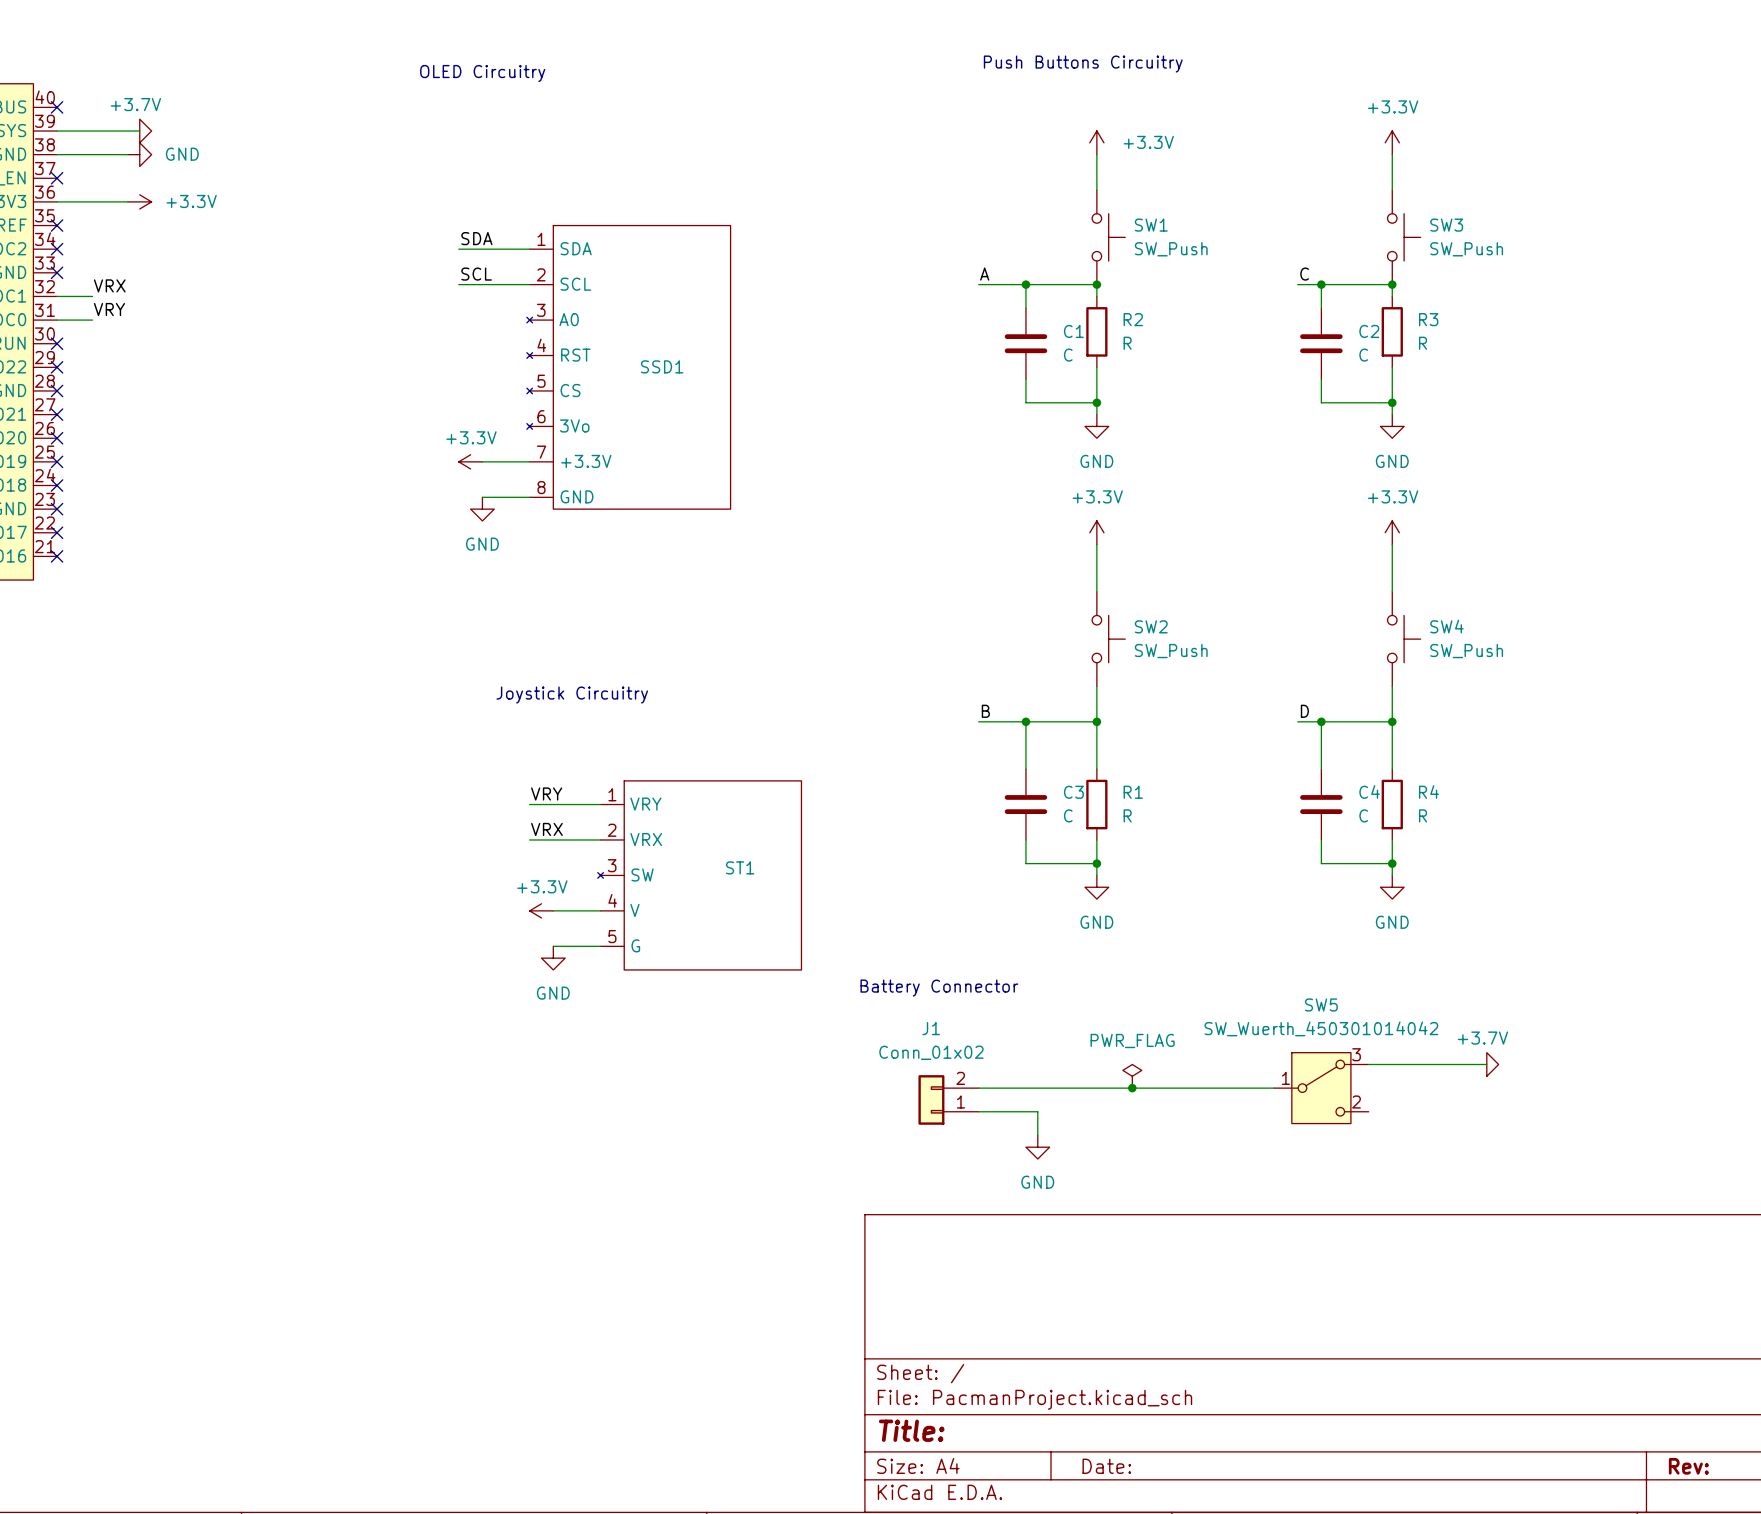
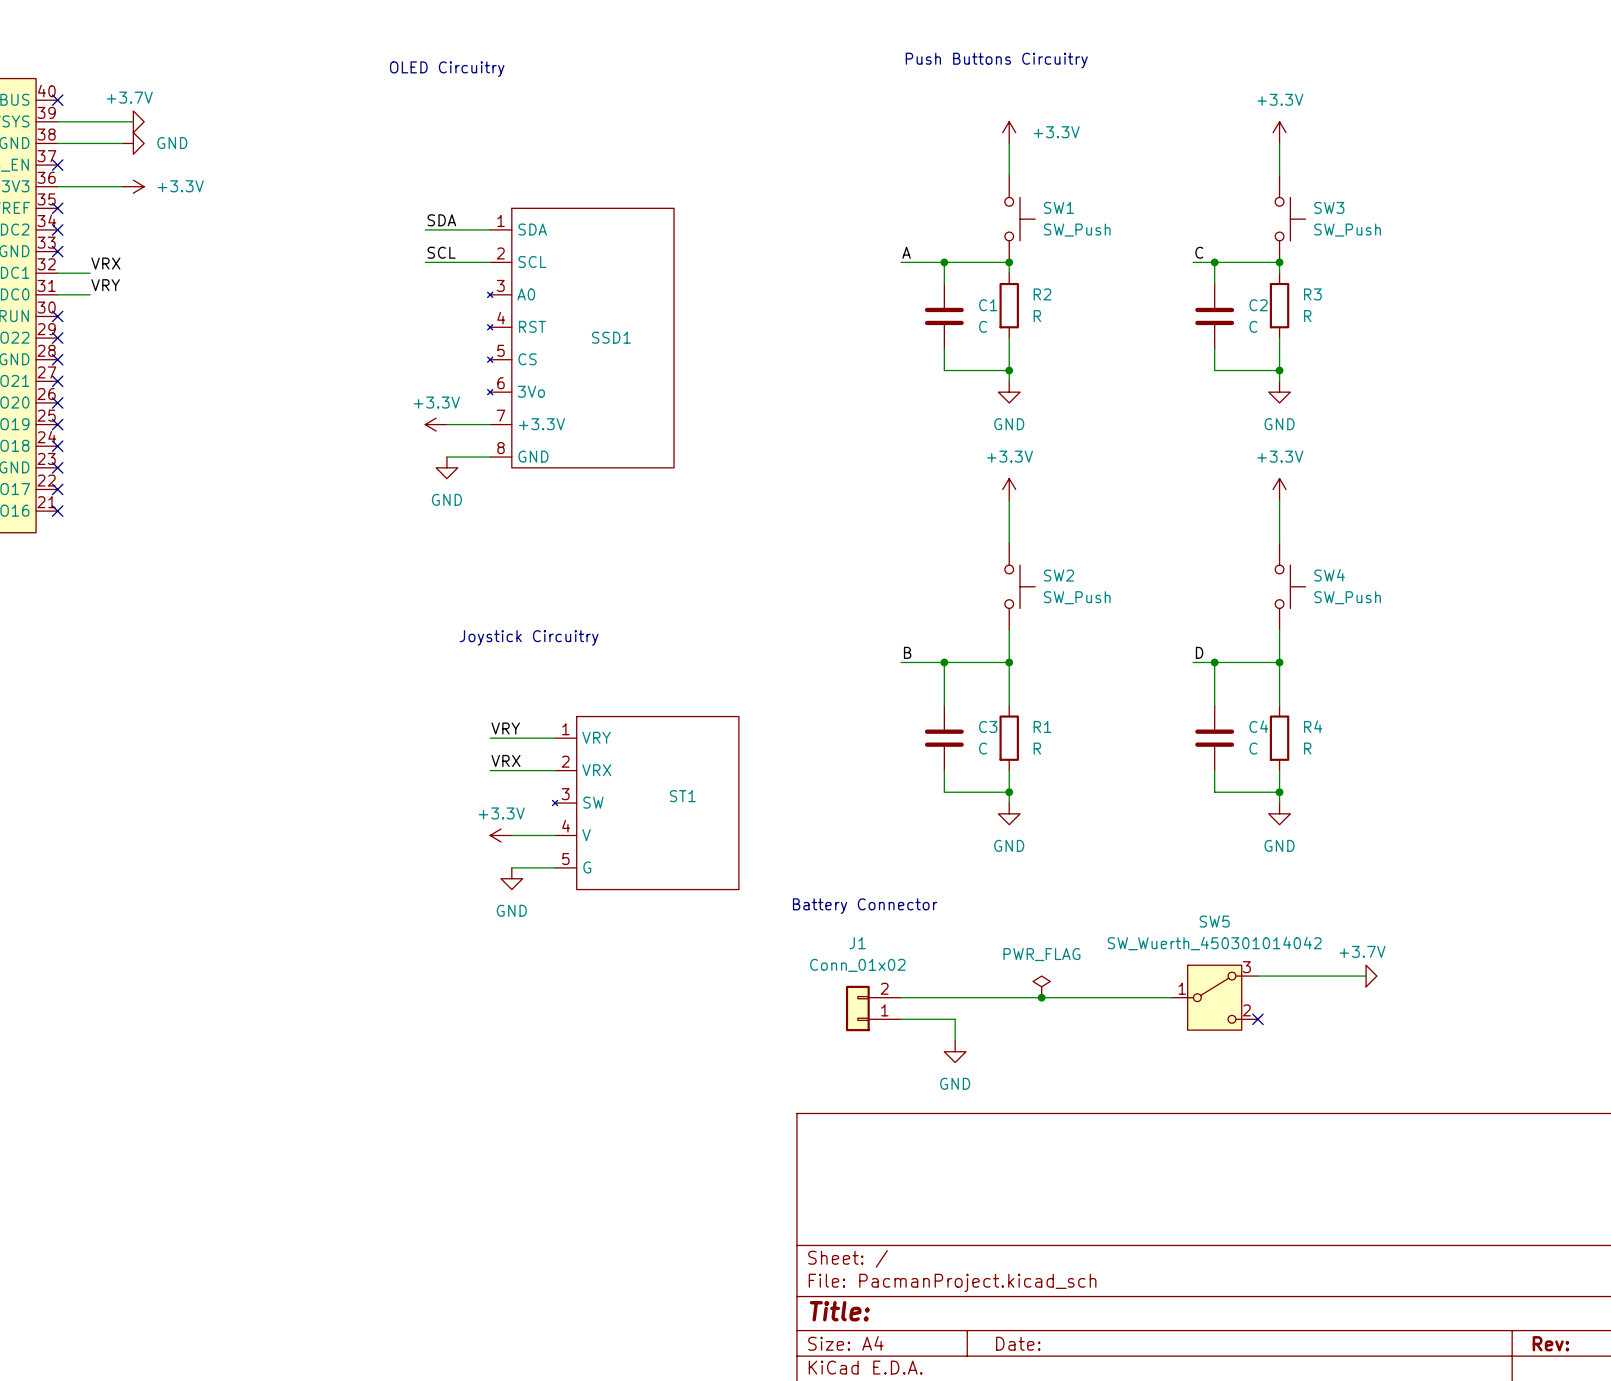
no-connect mark: none -> (1257, 1019)

